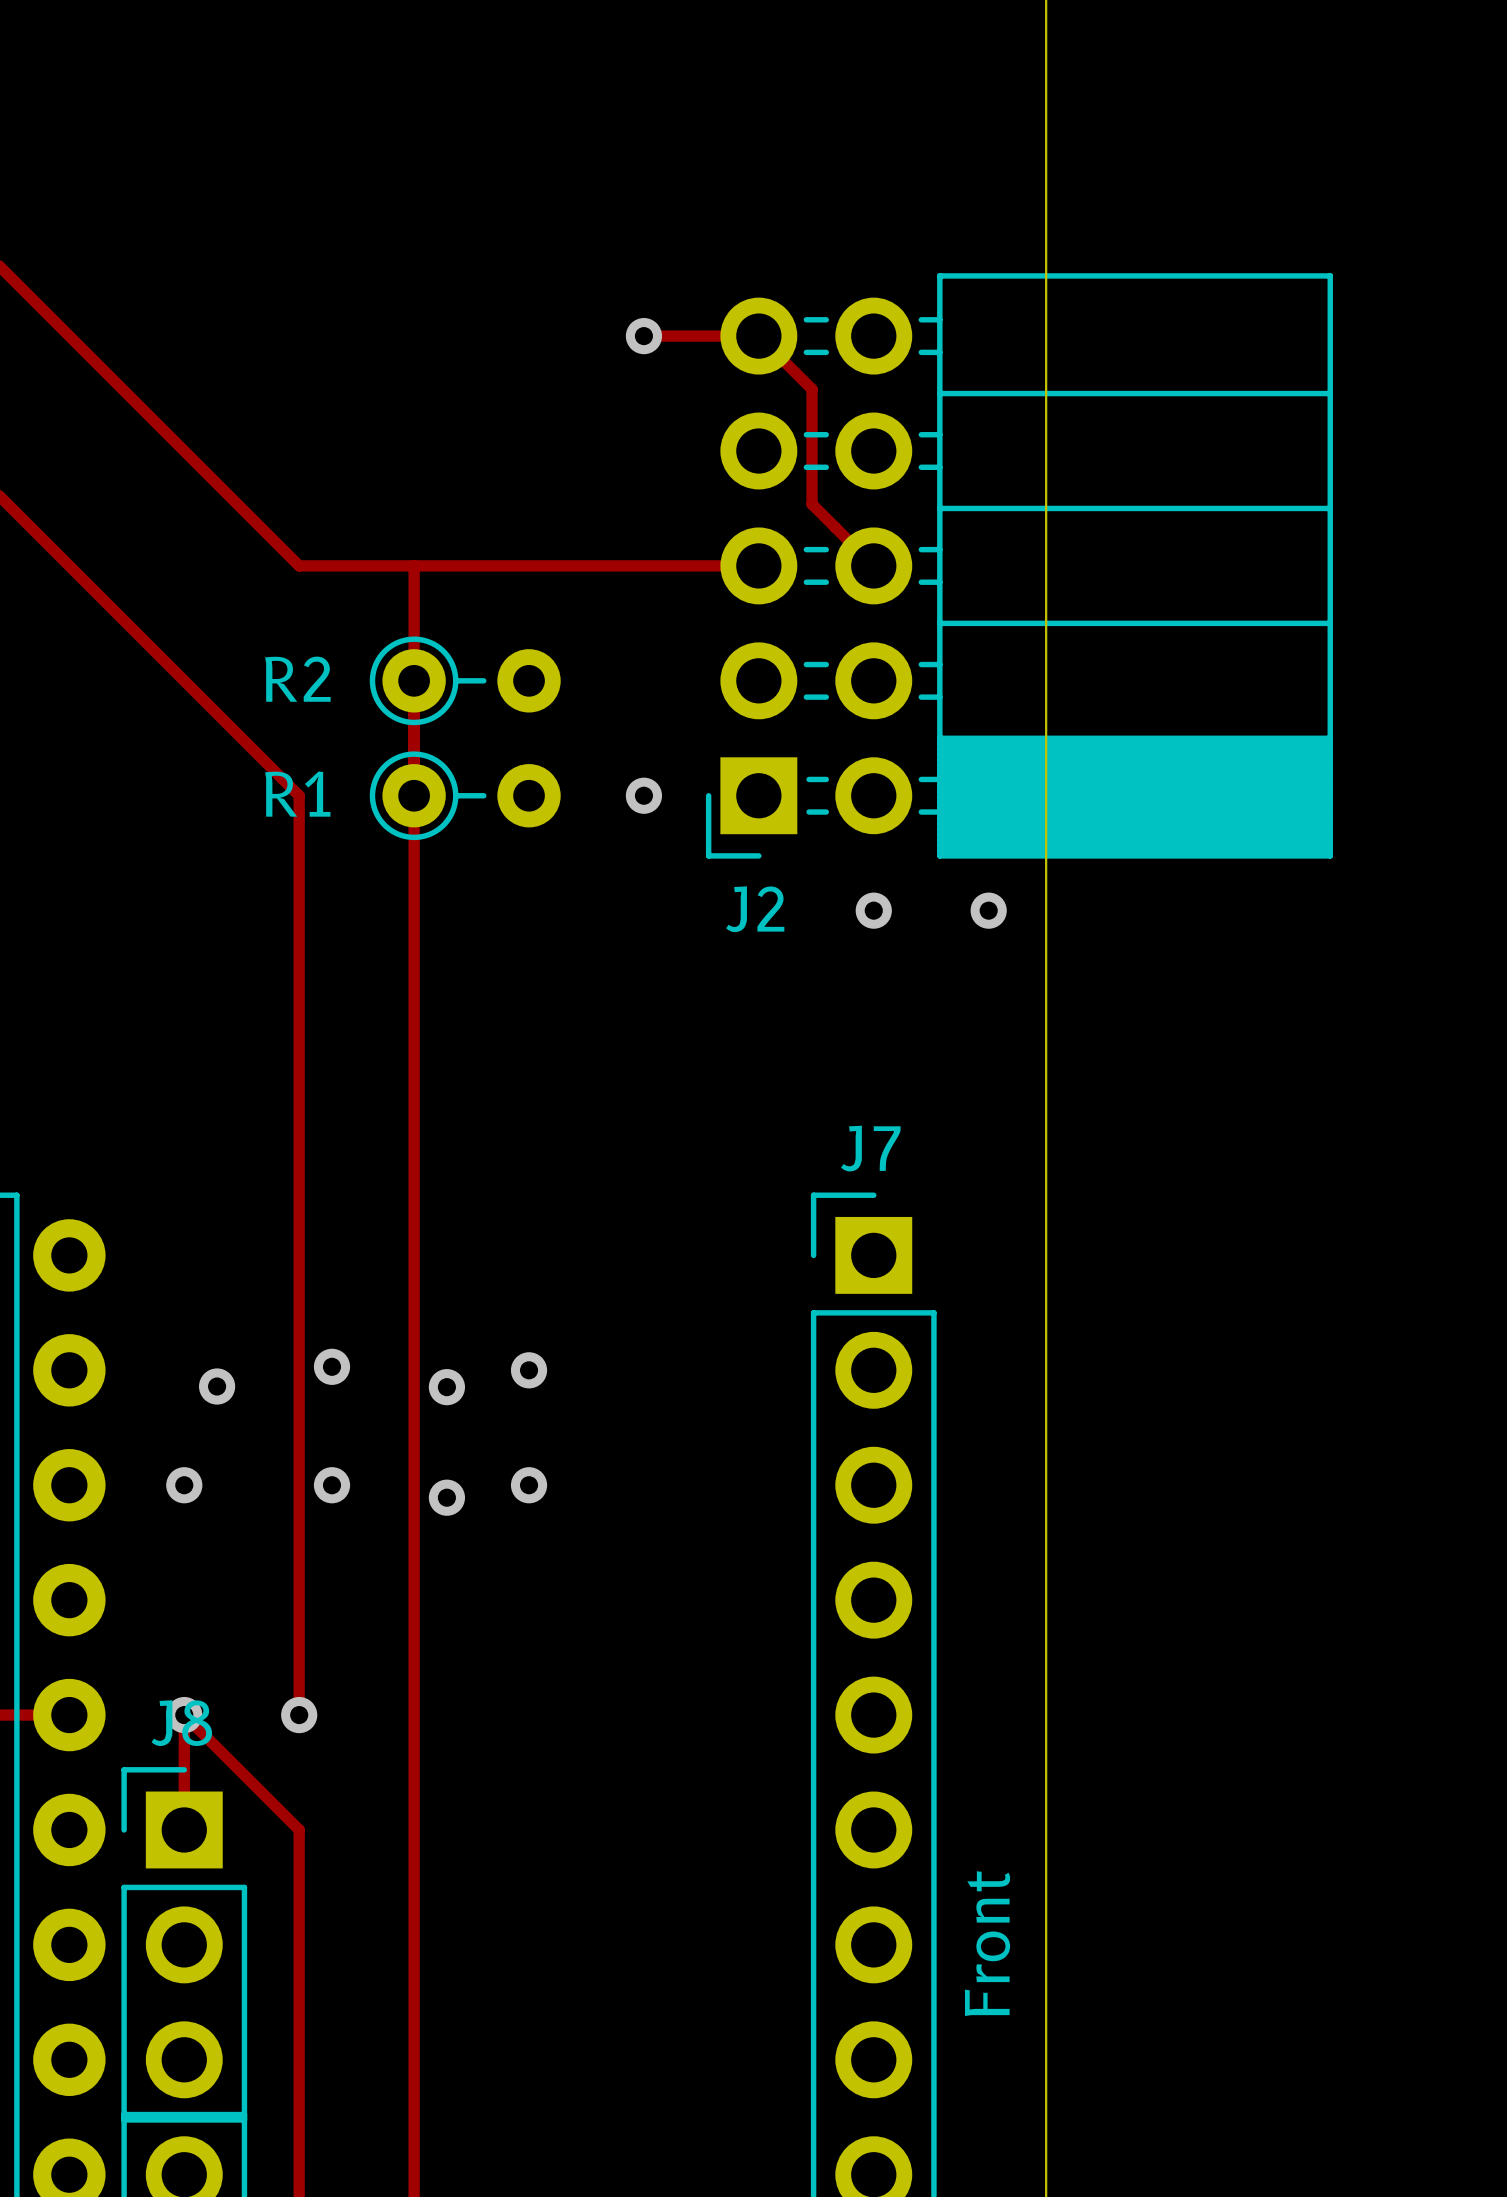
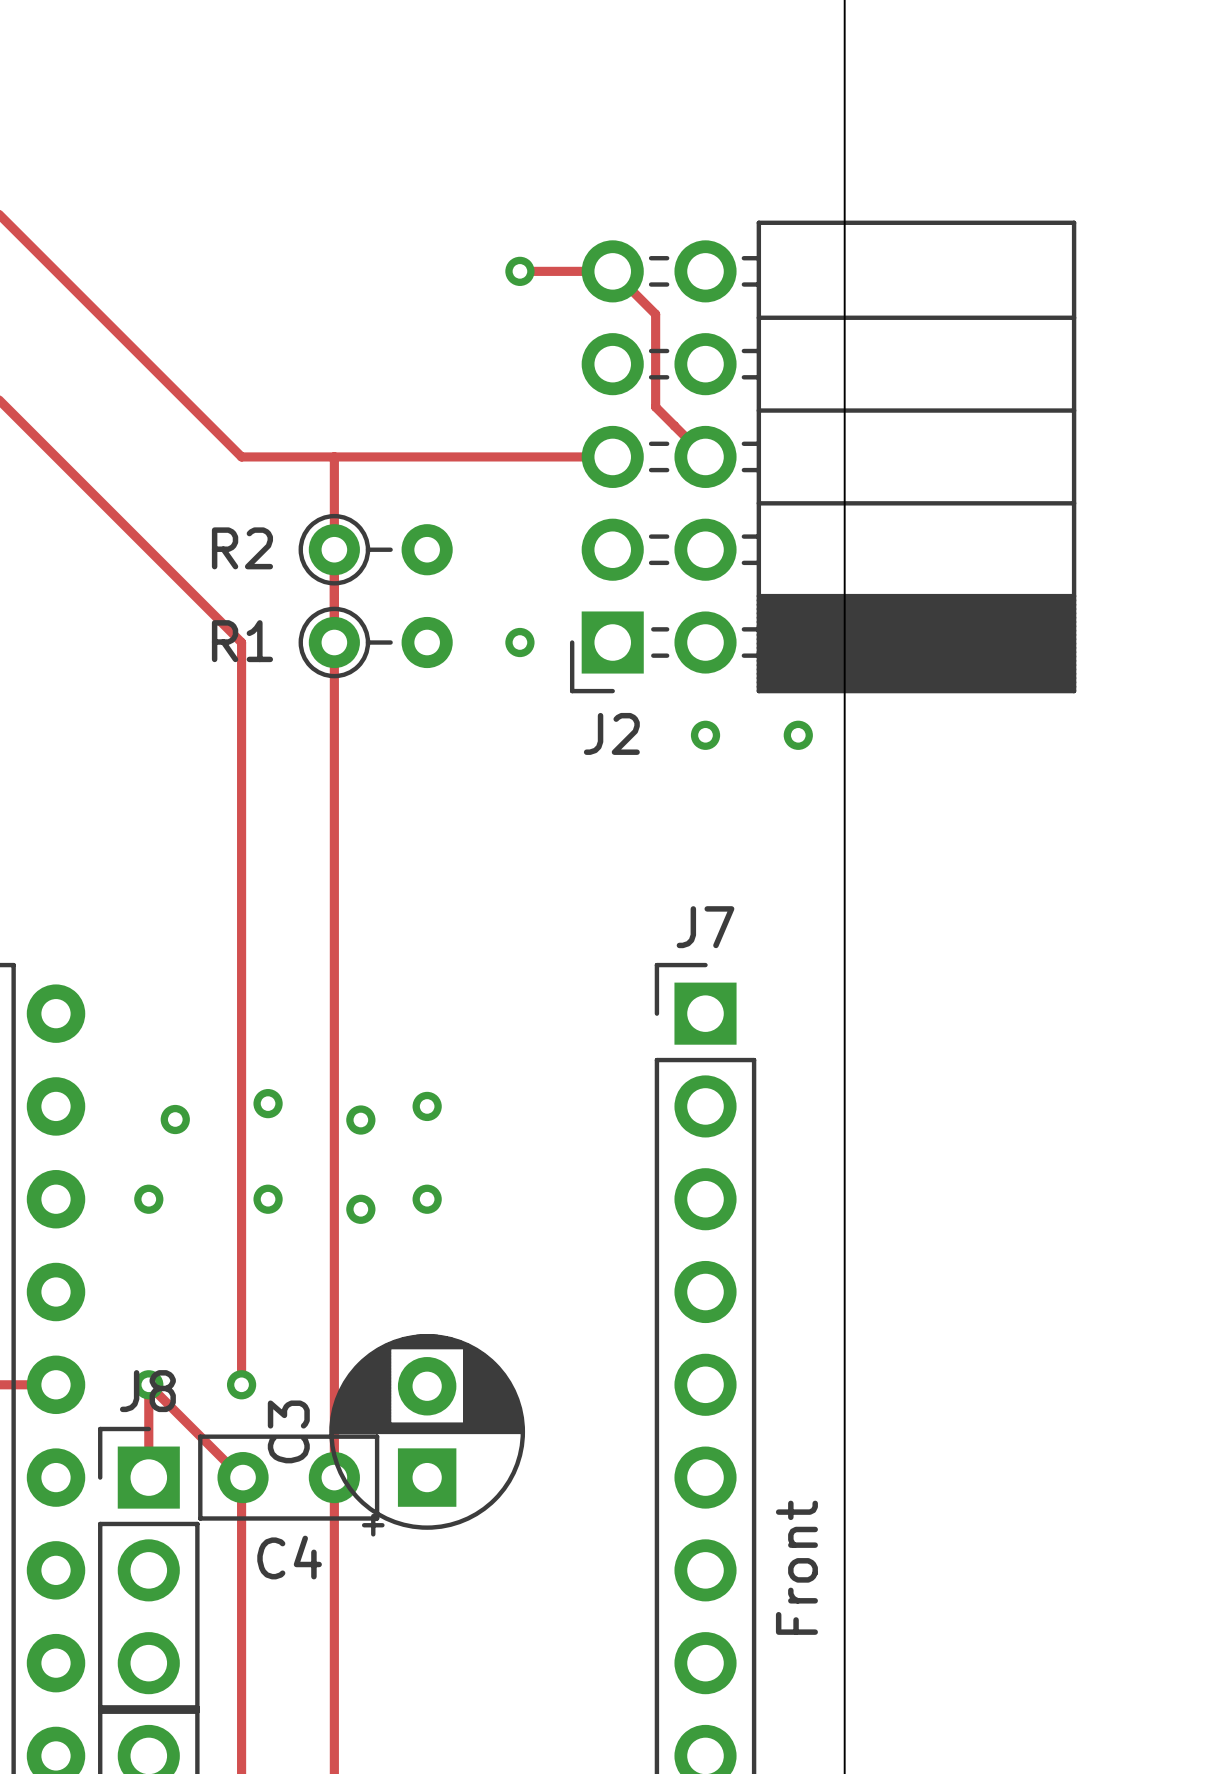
C3: none -> (427, 1435)
C4: none -> (288, 1477)

